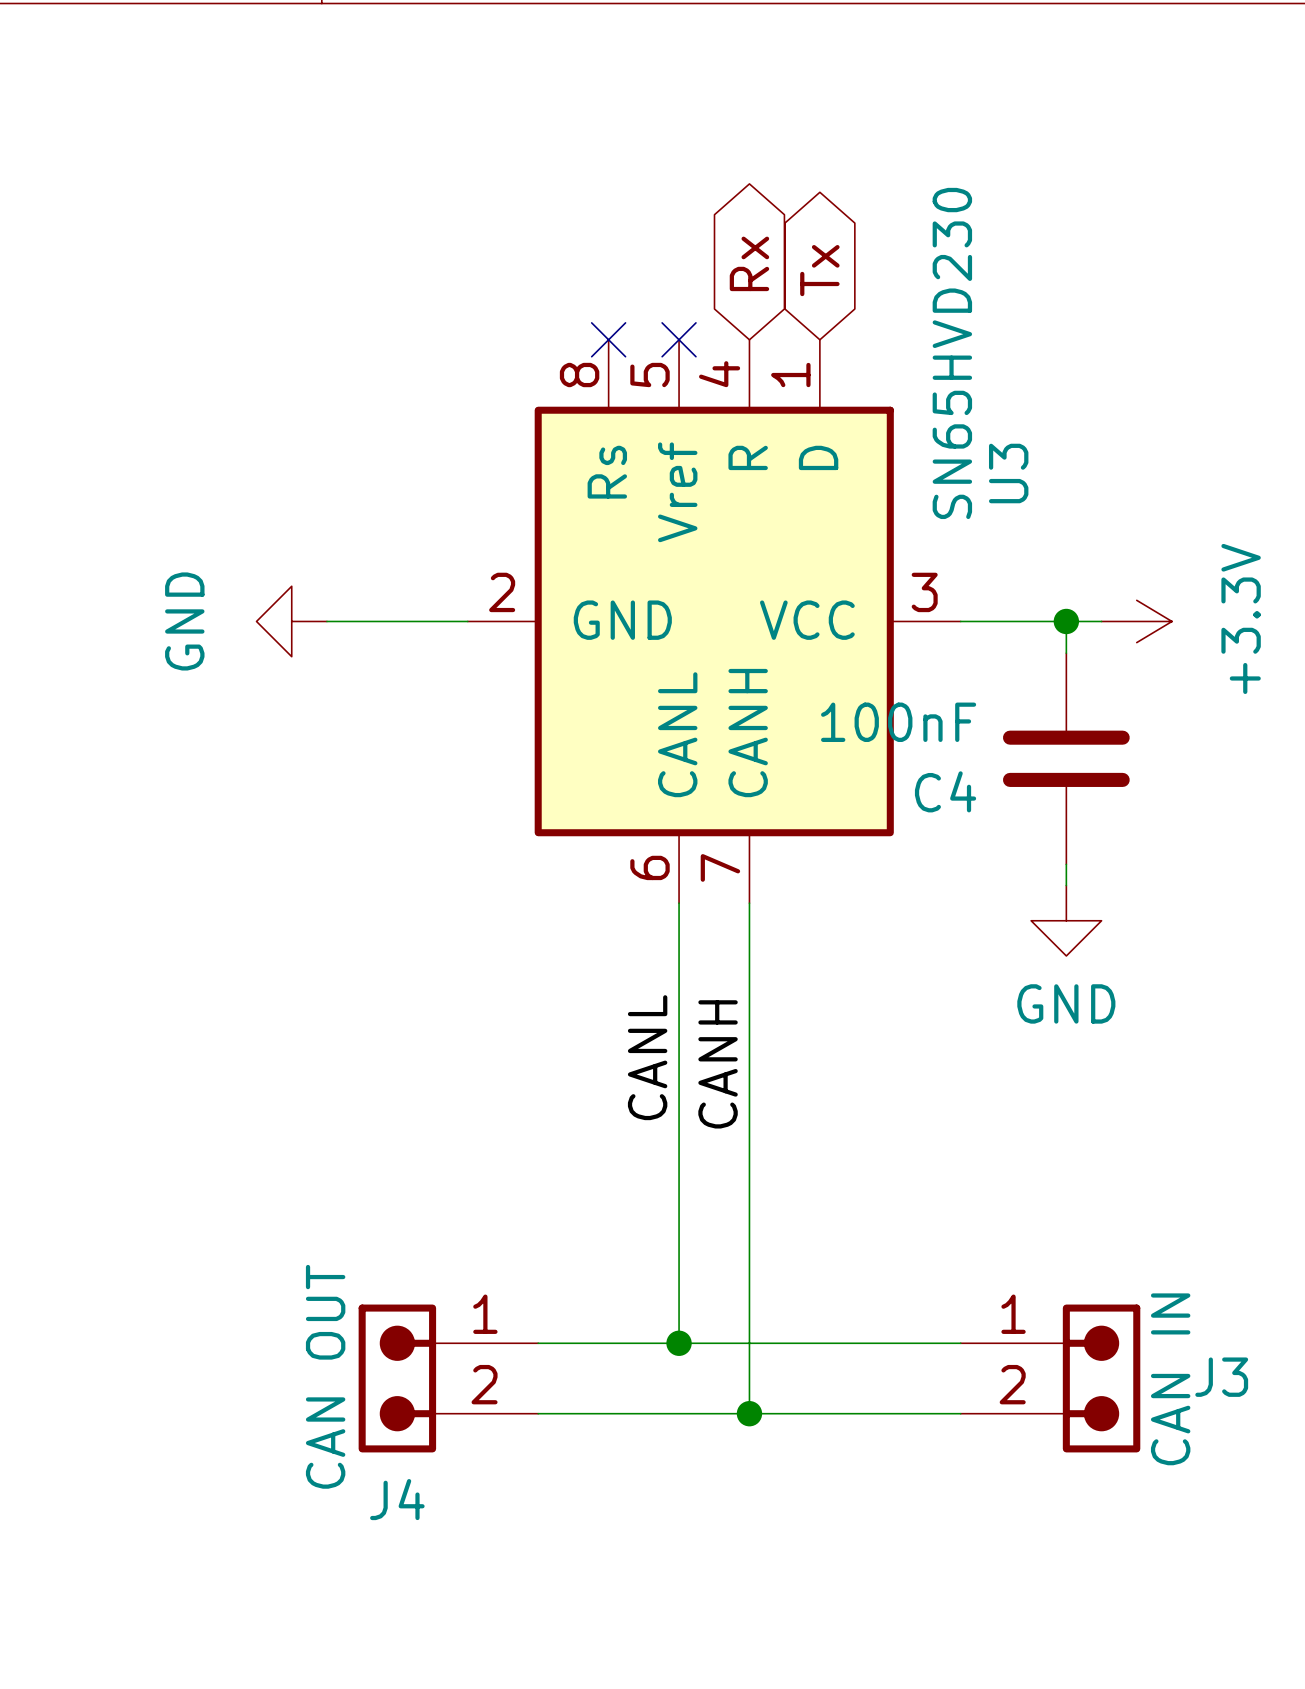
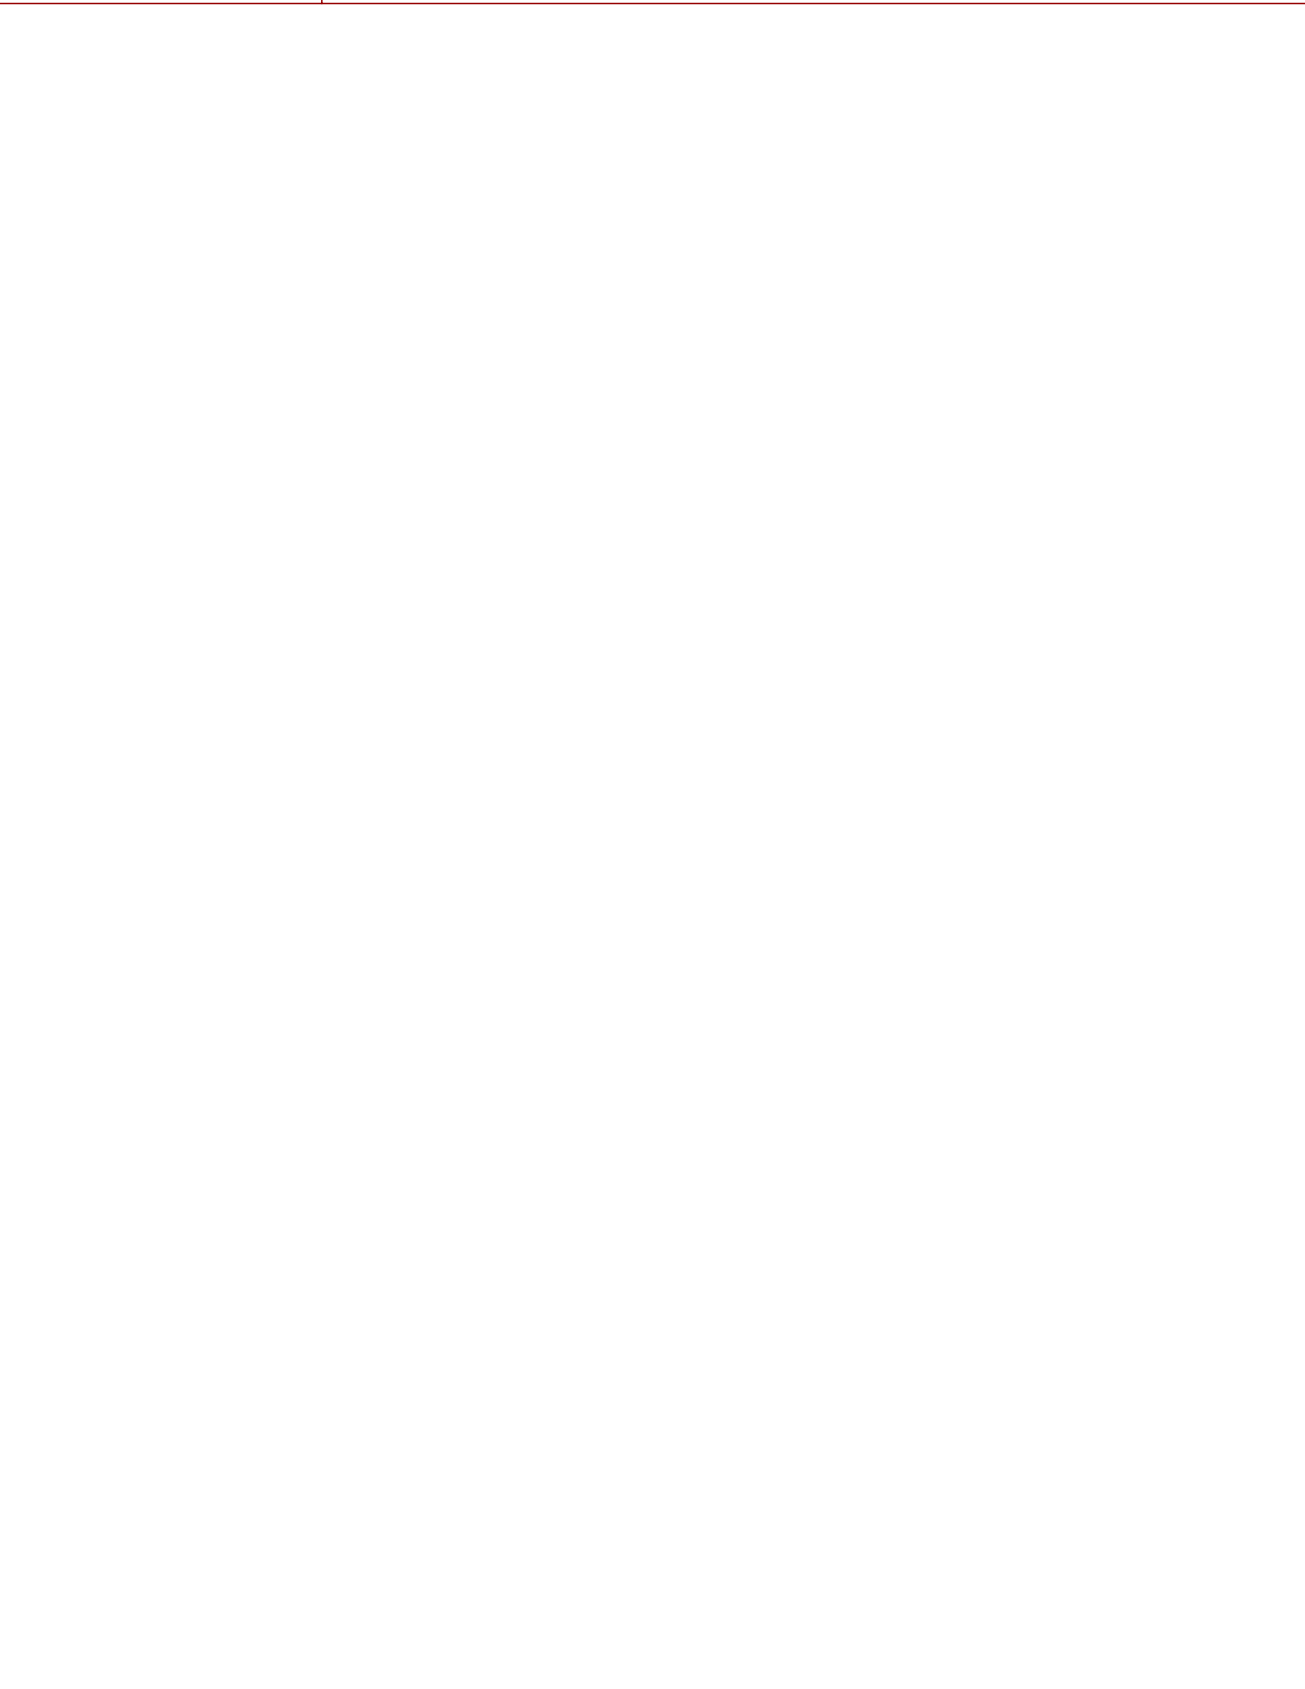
global label: Rx (749, 263) -> none
global label: Tx (819, 270) -> none
no-connect mark: (608, 339) -> none
no-connect mark: (679, 339) -> none
power symbol: GND (291, 621) -> none
wire: (326, 621) (467, 621) -> none
U3: SN65HVD230 (714, 621) -> none
wire: (960, 621) (1101, 621) -> none
wire: (1066, 621) (1066, 653) -> none
junction: (1066, 621) -> none
power symbol: +3.3V (1136, 621) -> none
C4: 100nF (1066, 758) -> none
wire: (1066, 864) (1066, 885) -> none
wire: (679, 903) (679, 1343) -> none
wire: (749, 903) (749, 1413) -> none
power symbol: GND (1066, 920) -> none
label: CANL (647, 1057) -> none
label: CANH (718, 1064) -> none
wire: (538, 1343) (960, 1343) -> none
junction: (679, 1343) -> none
J4: CAN OUT (448, 1378) -> none
J3: CAN IN (1050, 1378) -> none
wire: (538, 1413) (960, 1413) -> none
junction: (749, 1413) -> none

